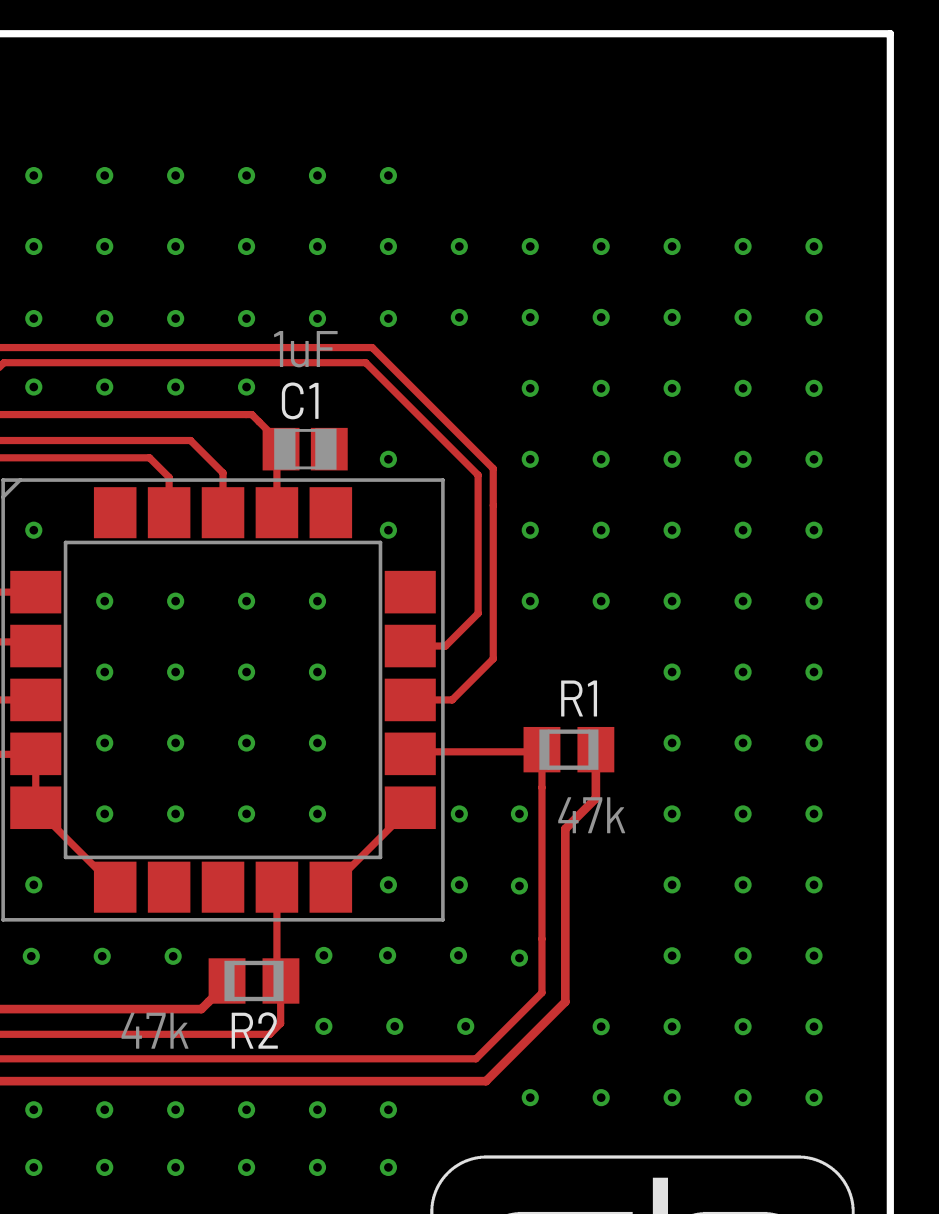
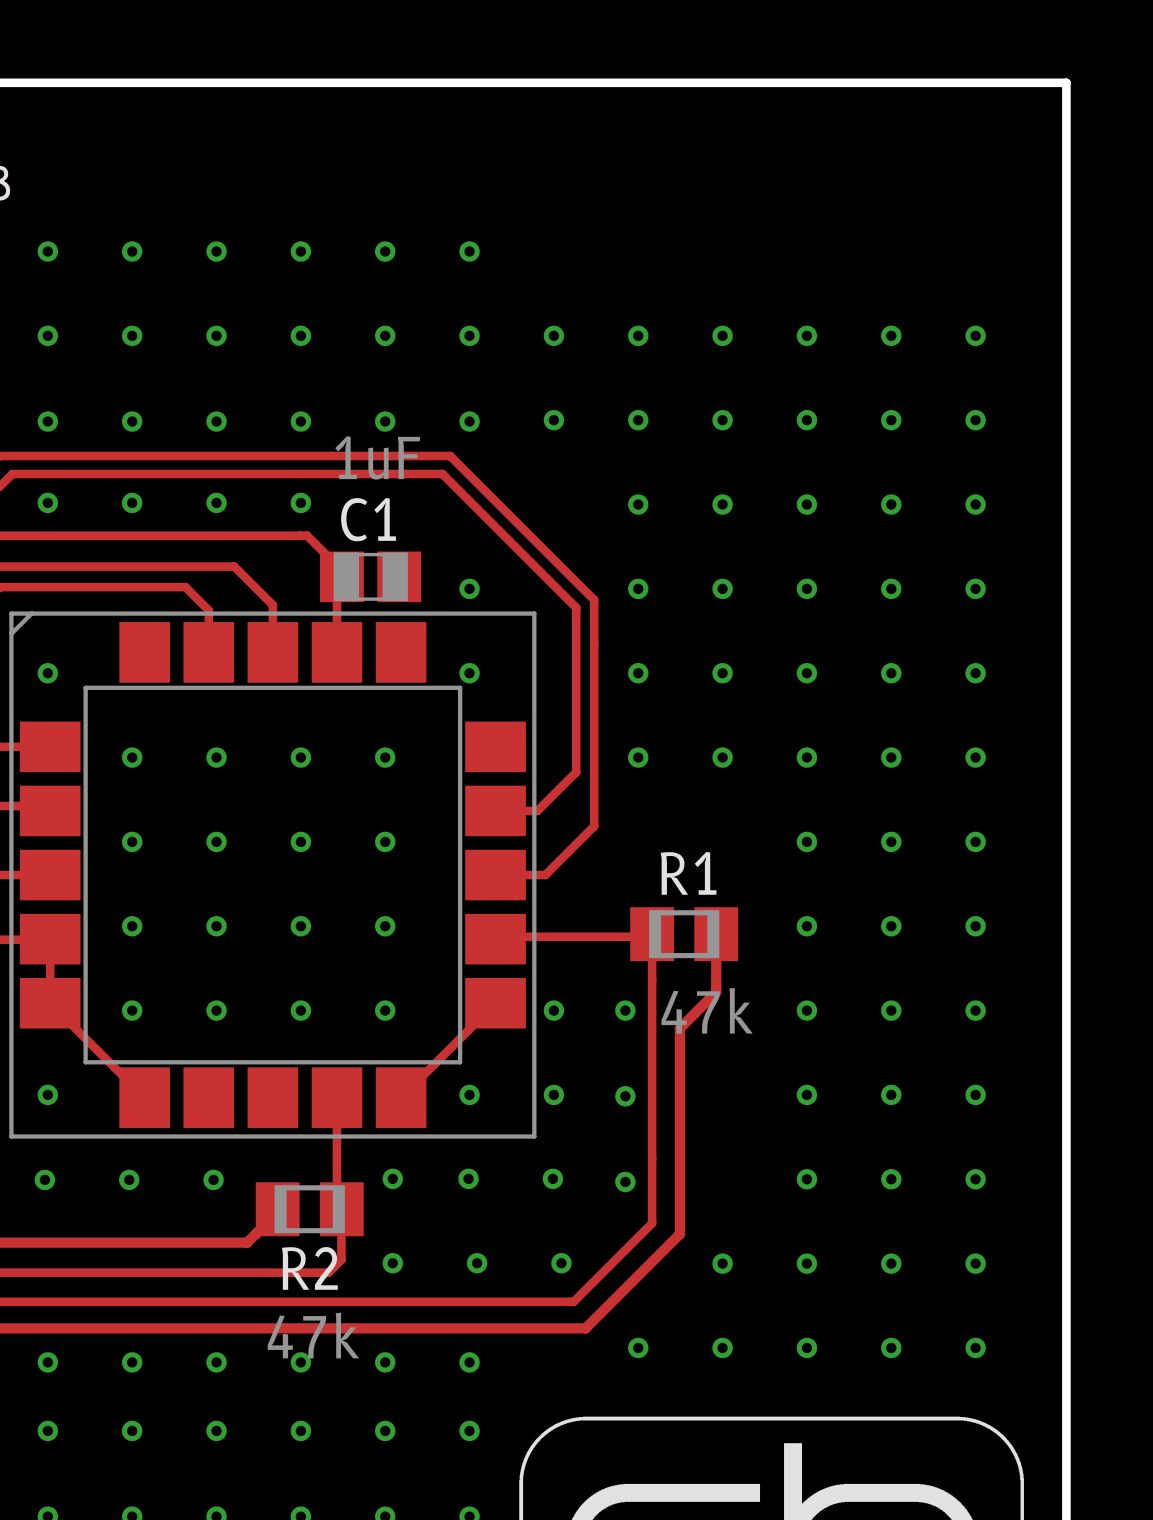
R2 value position: 47k (155, 1030) -> 47k (313, 1335)

